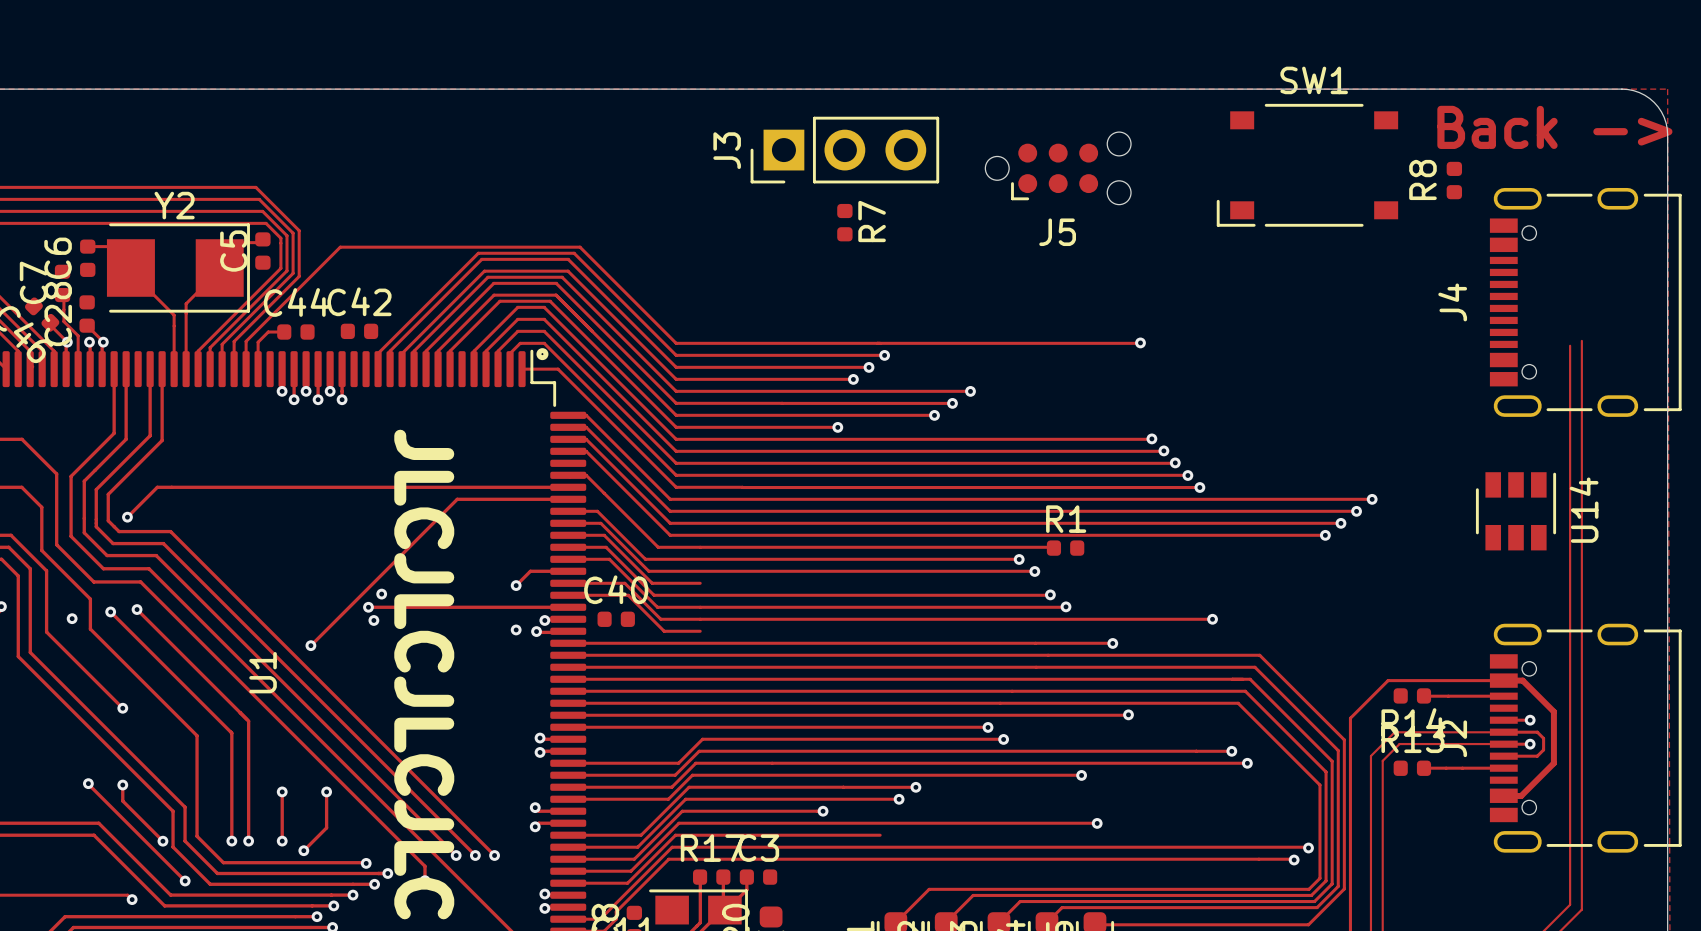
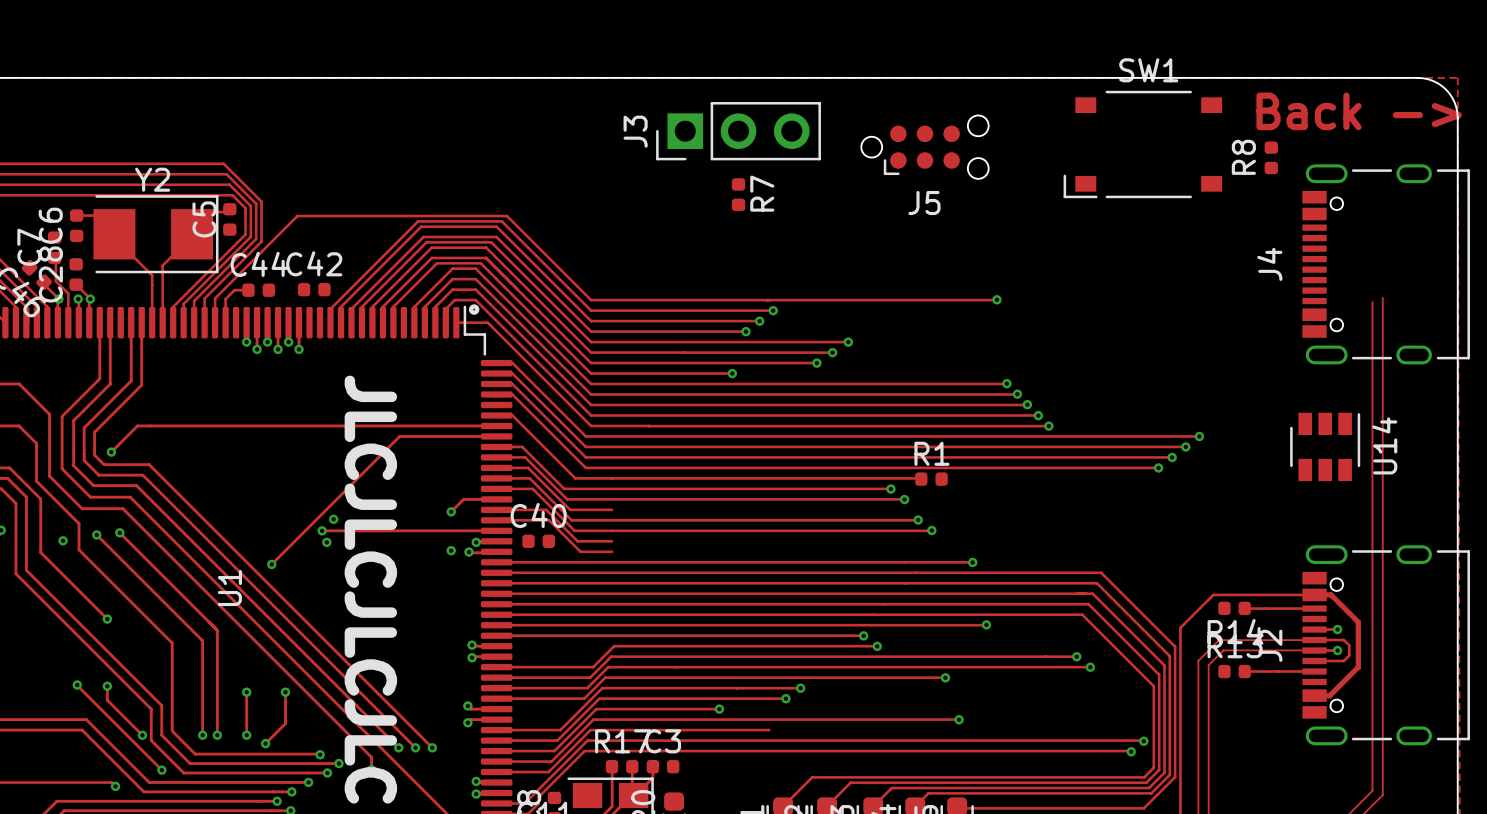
track: (700, 619) (1212, 619) -> none
via: (1212, 619) -> none

